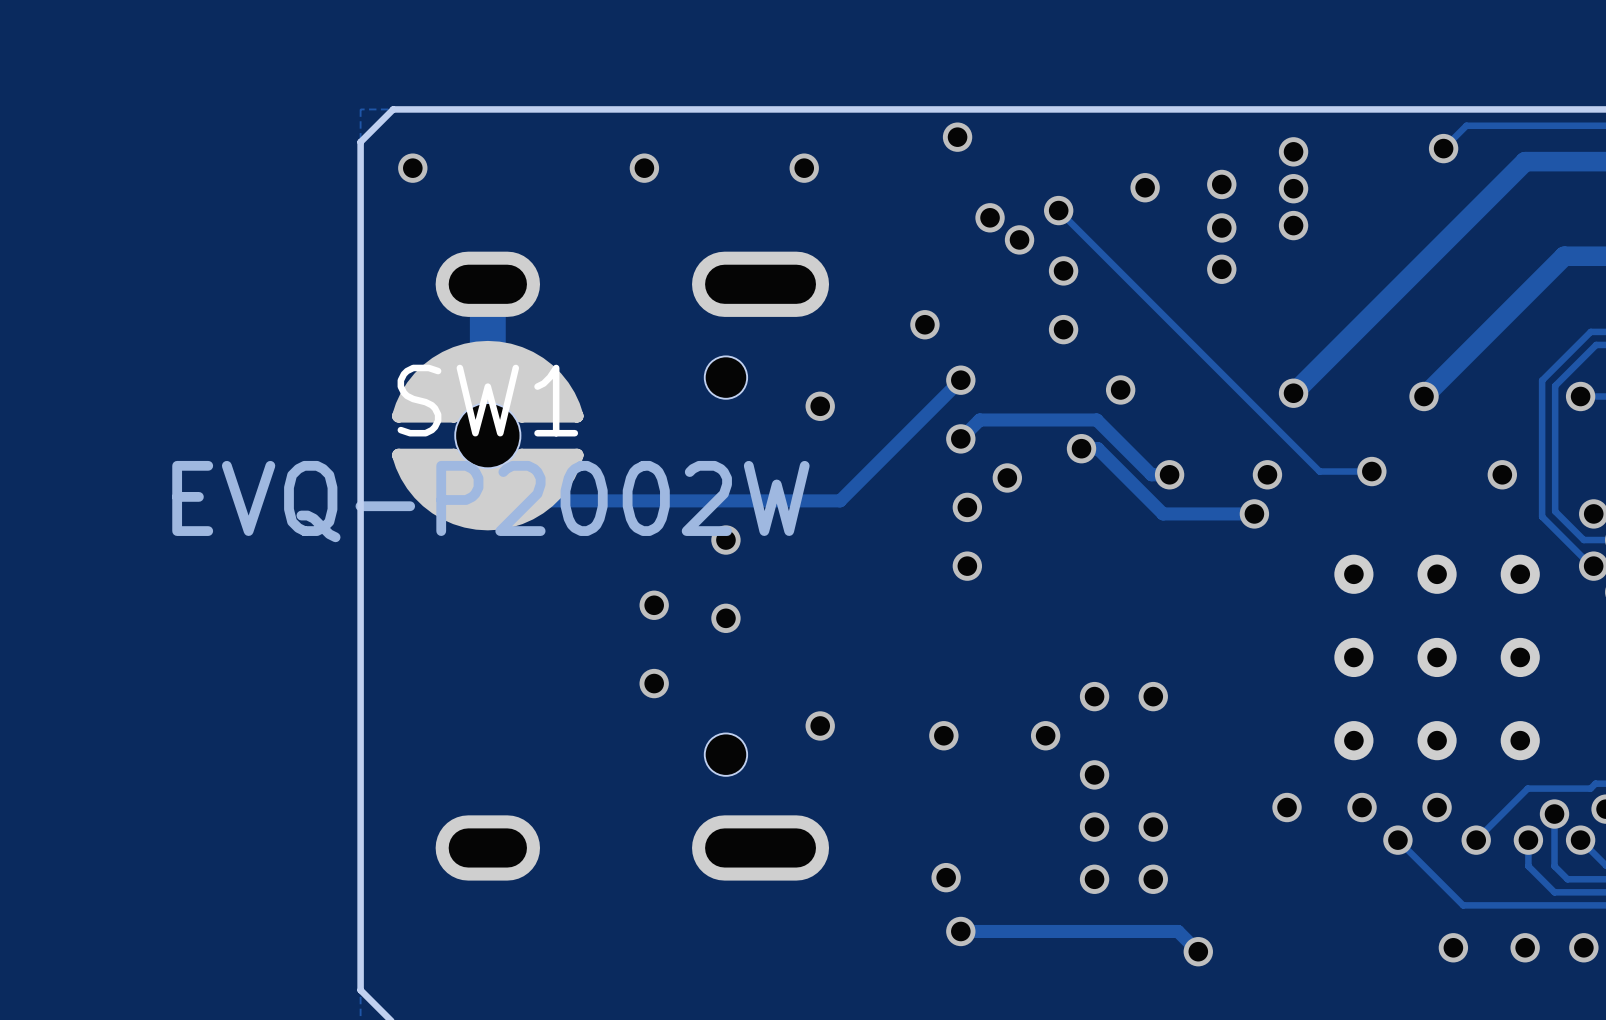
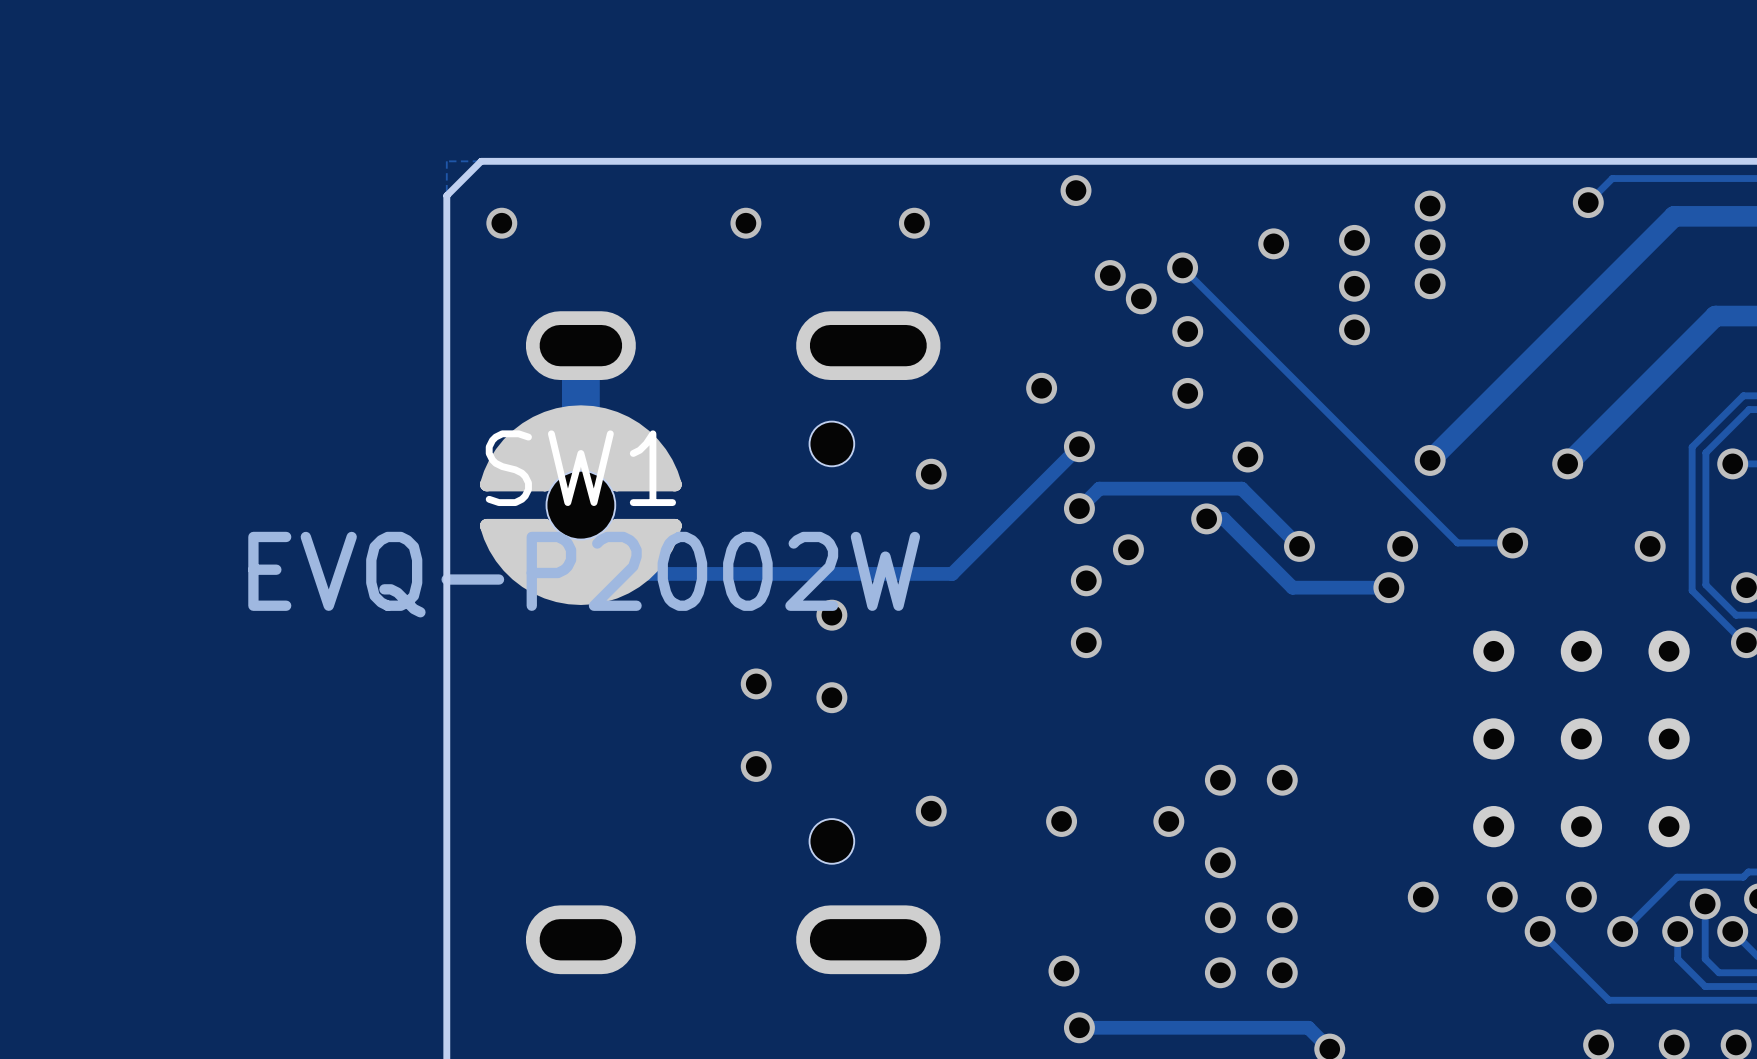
track: (1096, 419) (1151, 474) (1169, 474) -> (1222, 488) (1241, 488) (1299, 546)

